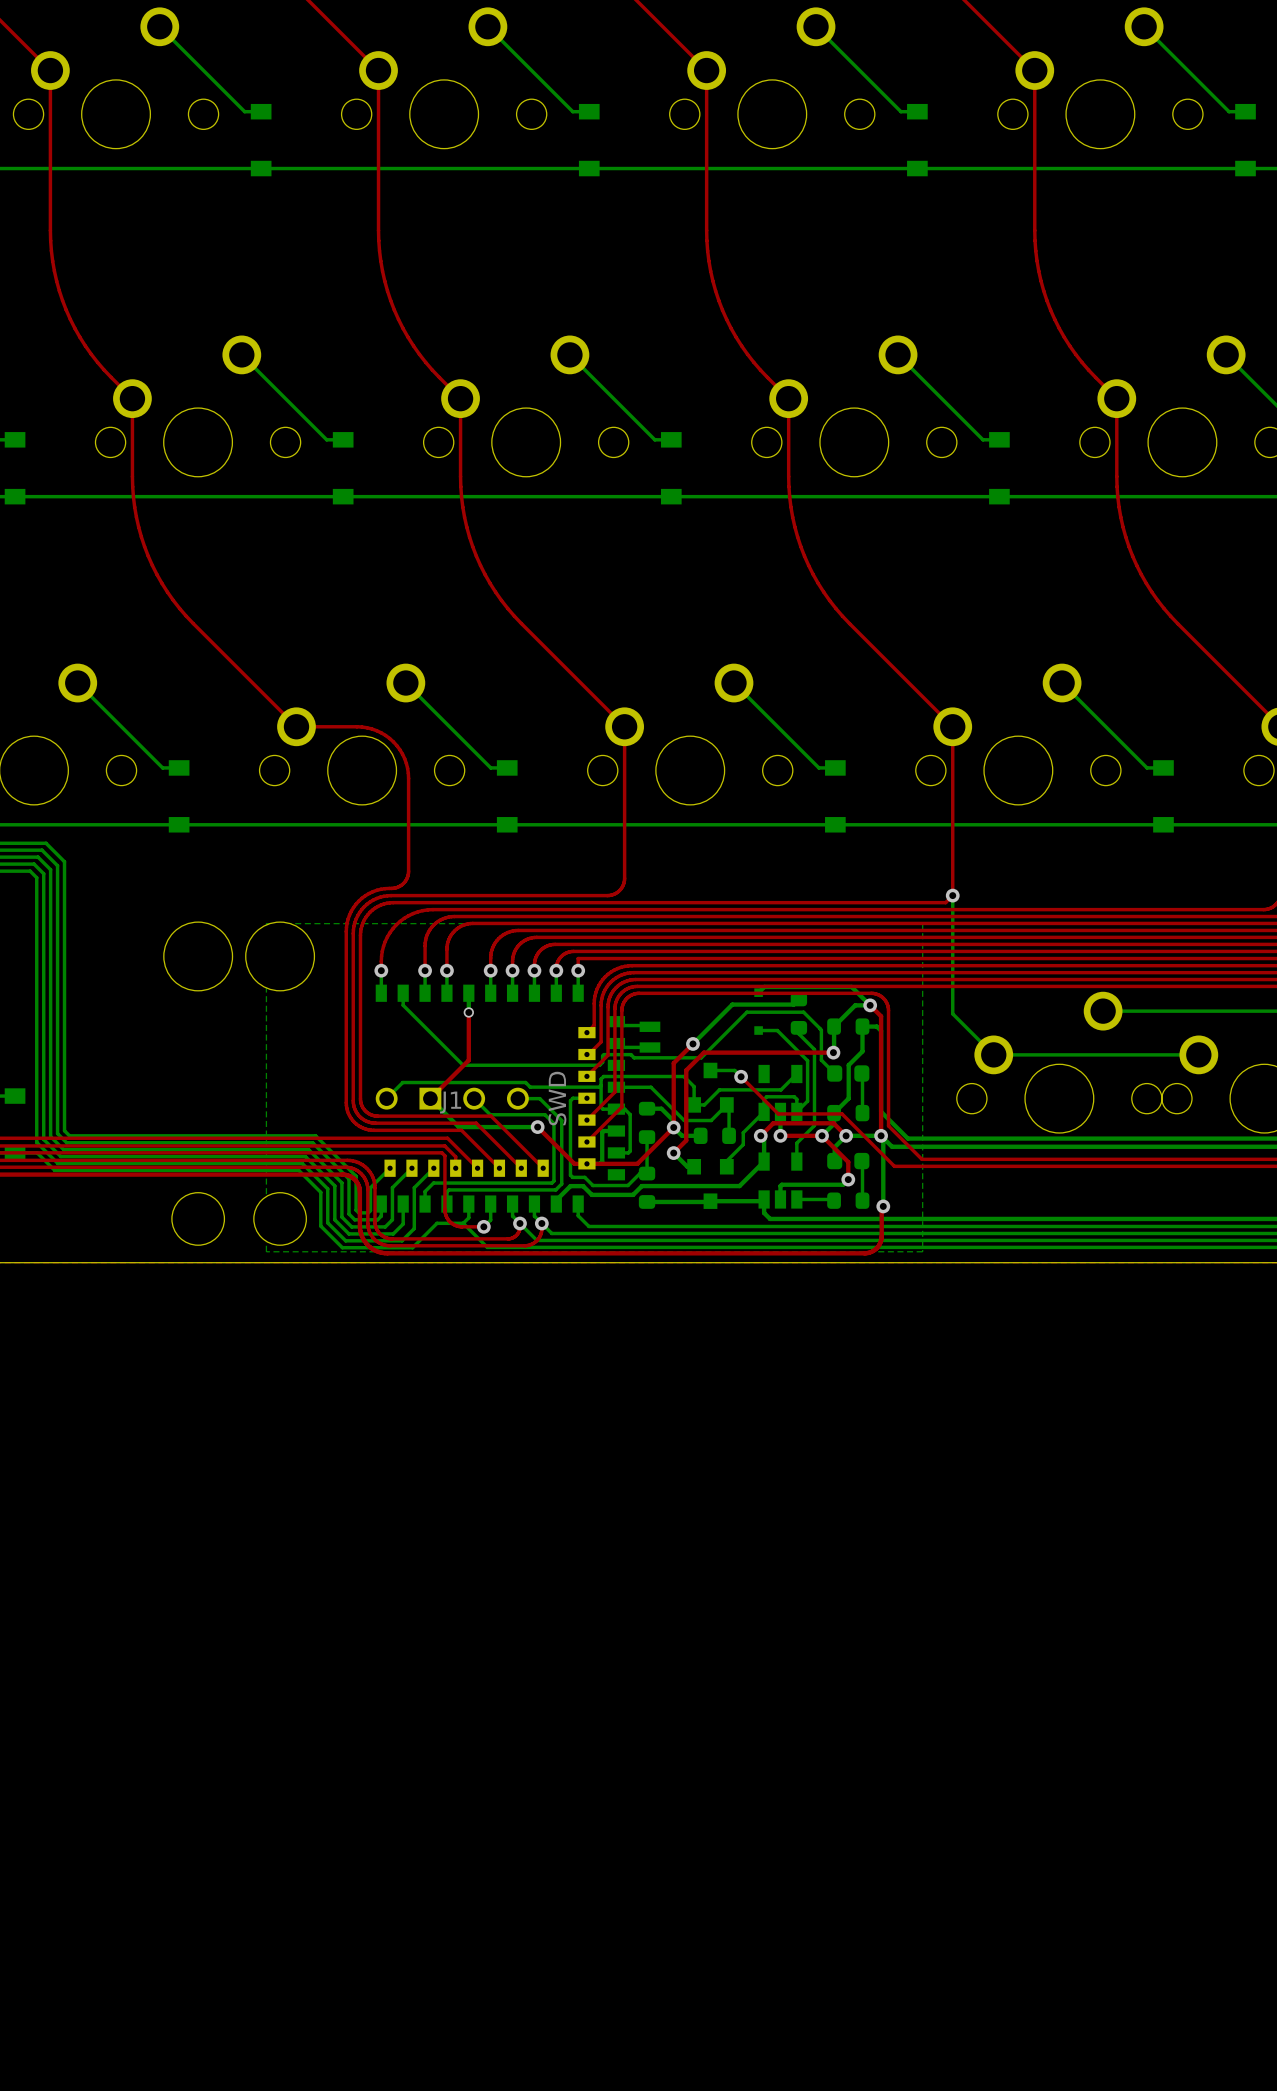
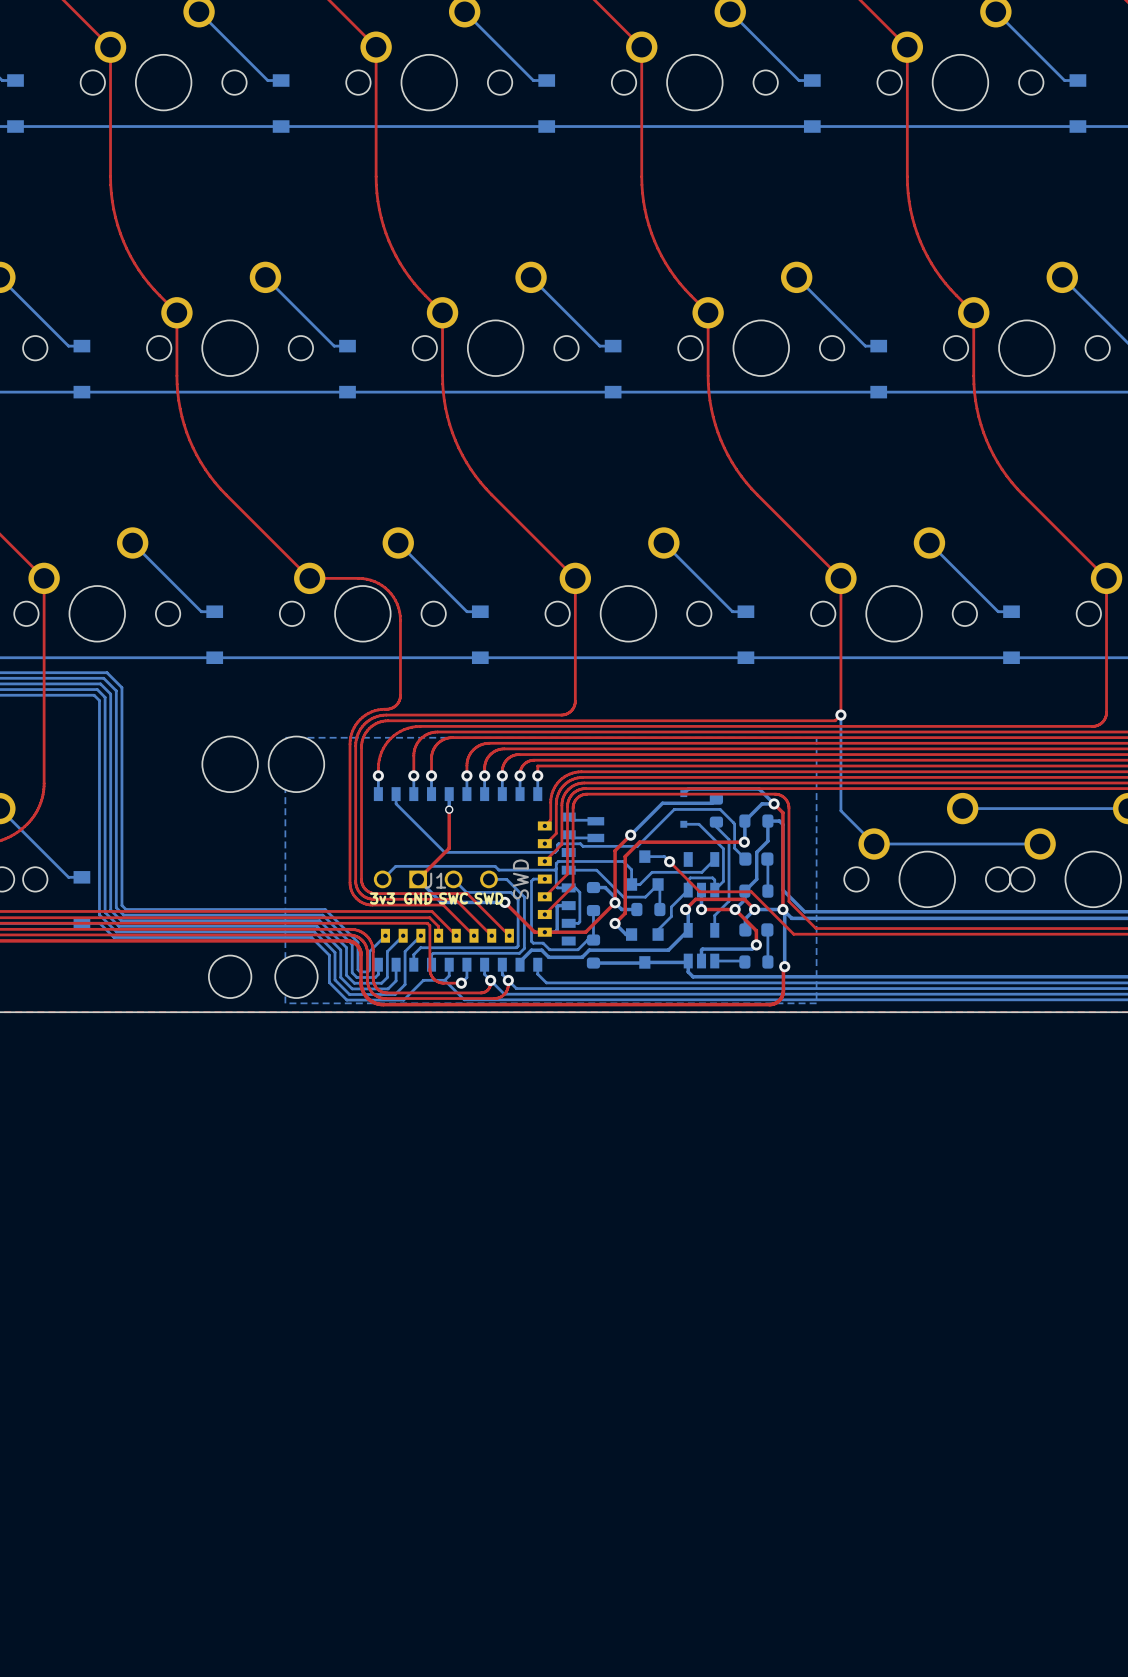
J1 text: none -> 3v3 (382, 898)
J1 text: none -> GND (418, 898)
J1 text: none -> SWC (453, 898)
J1 text: none -> SWD (489, 898)

